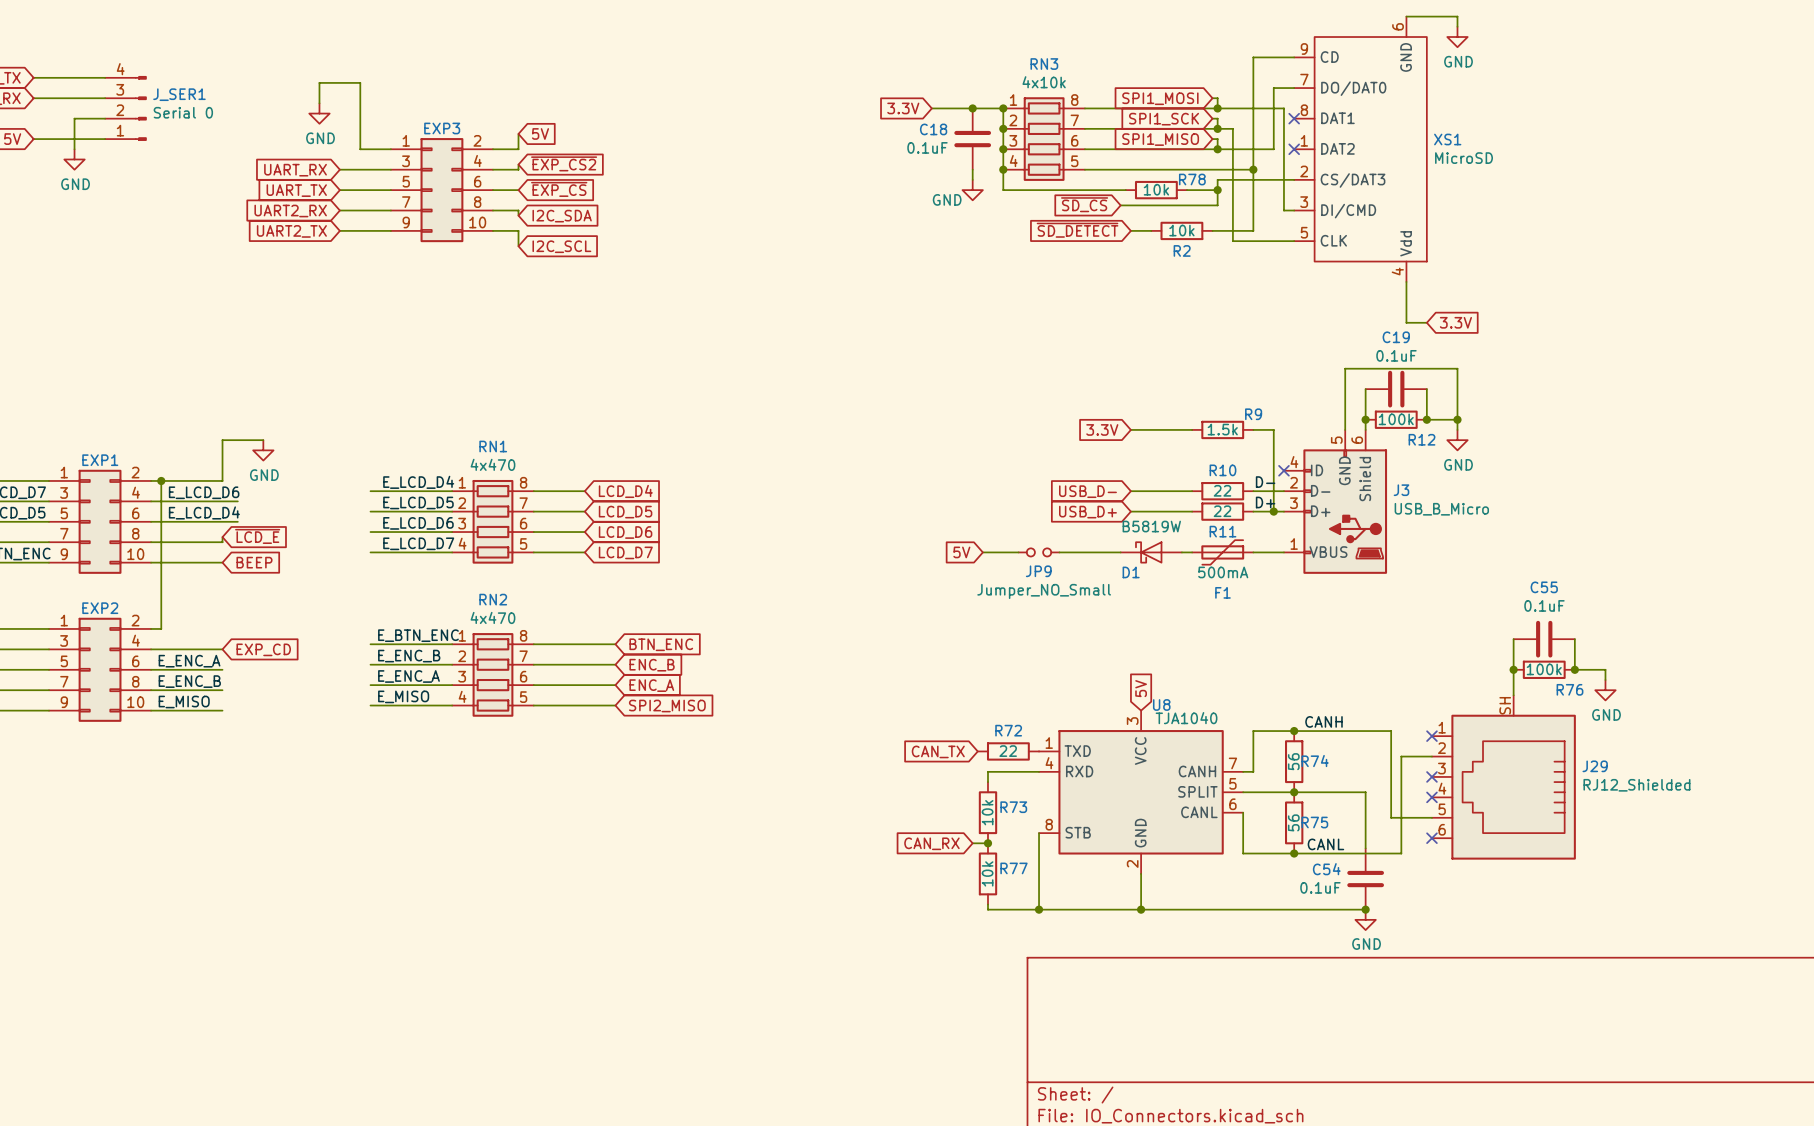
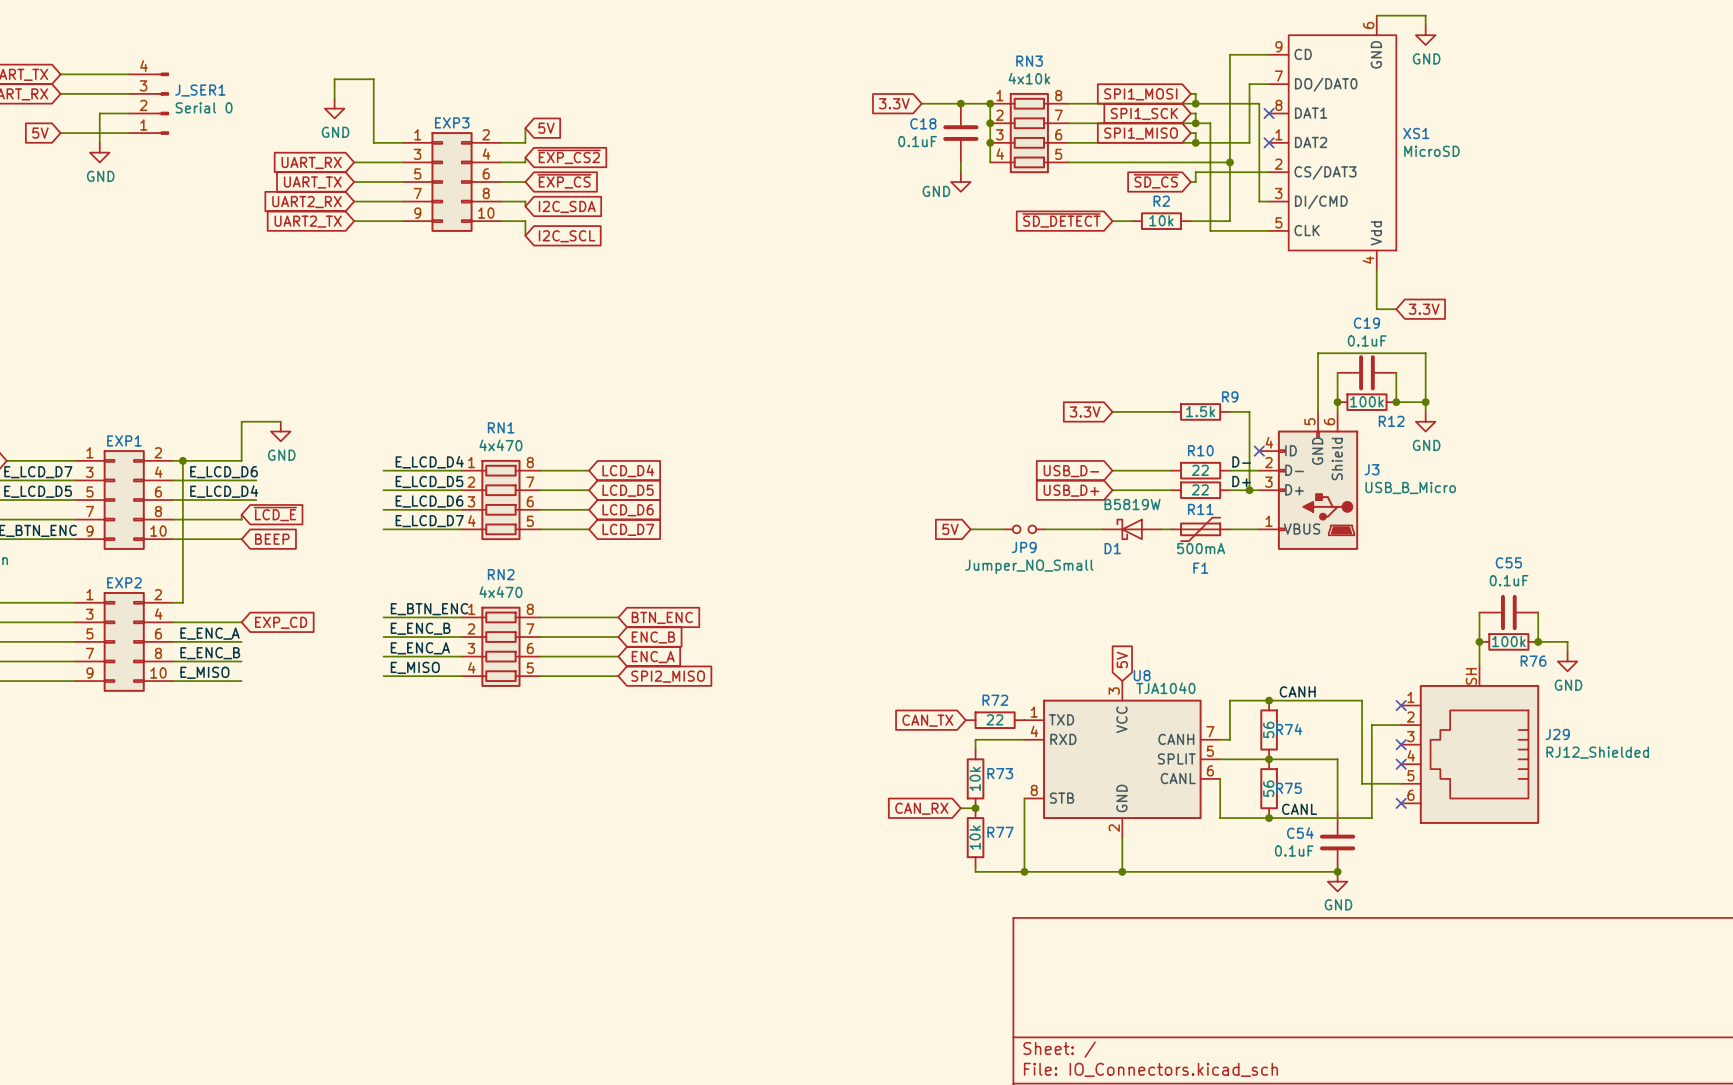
wire: (1003, 169) (1003, 190) (1125, 190) -> none
junction: (1003, 169) -> none
R78: 10k (1156, 190) -> none
wire: (1187, 190) (1212, 190) -> none
wire: (1217, 190) (1217, 205) (1120, 205) -> none
junction: (1217, 190) -> none
global label position: ~{SD_CS} (1084, 204) -> ~{SD_CS} (1156, 181)
R2 name position: R2 (1182, 250) -> R2 (1161, 201)

